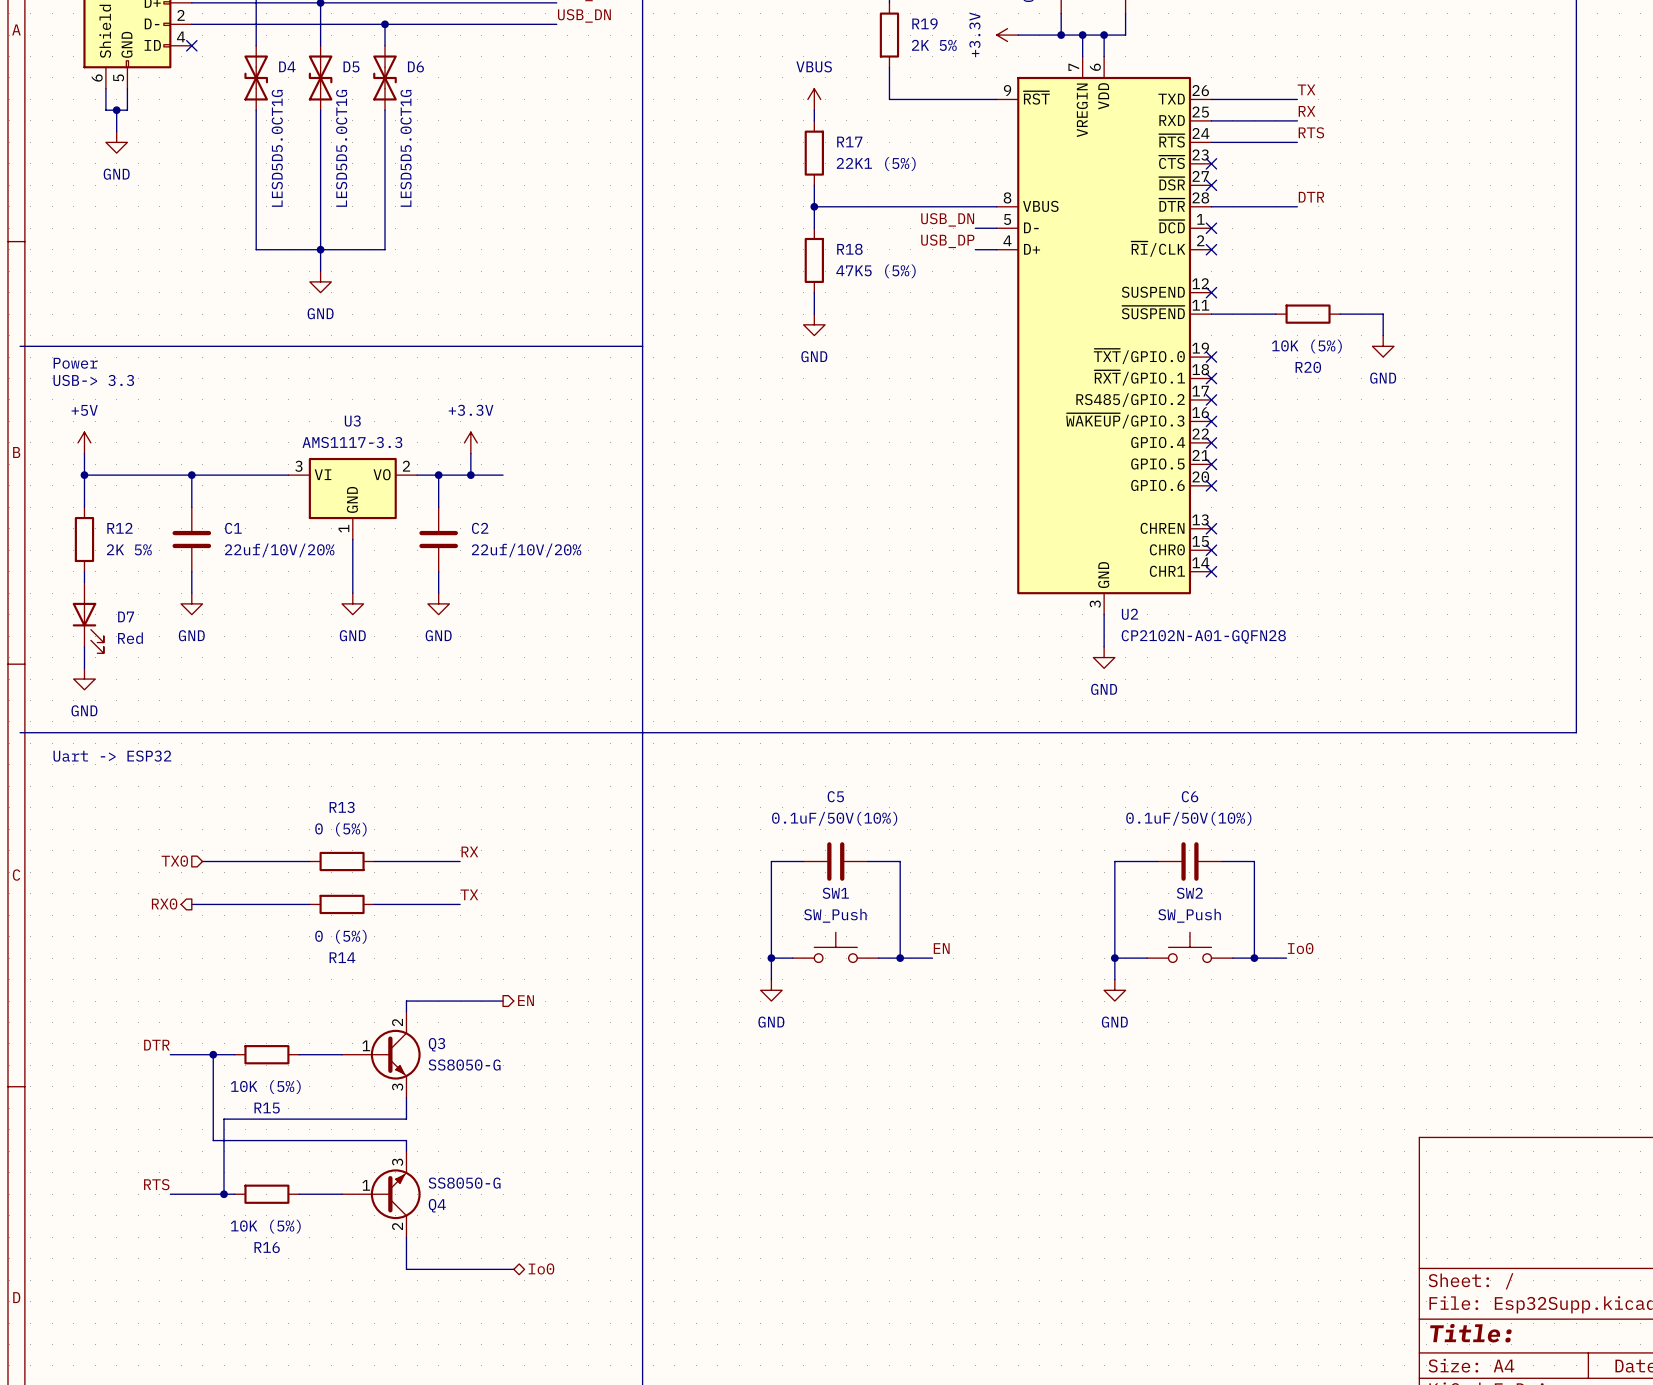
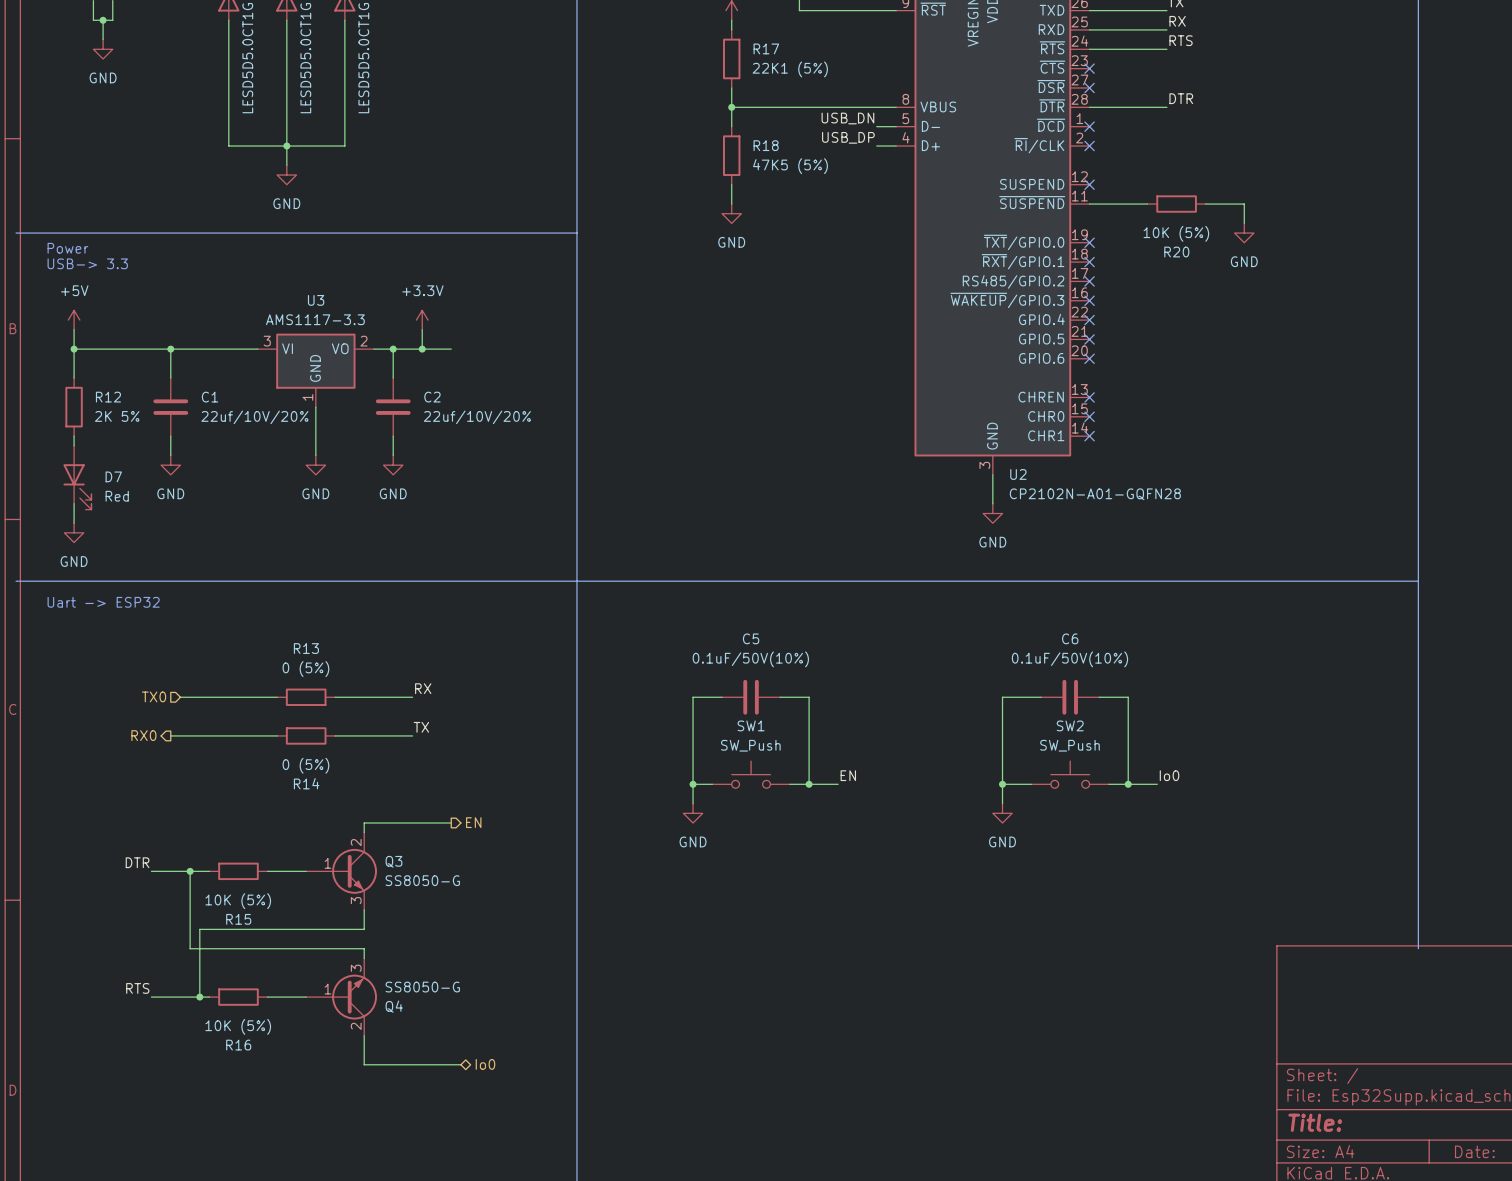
line: none -> (1418, 581) (1418, 948)

